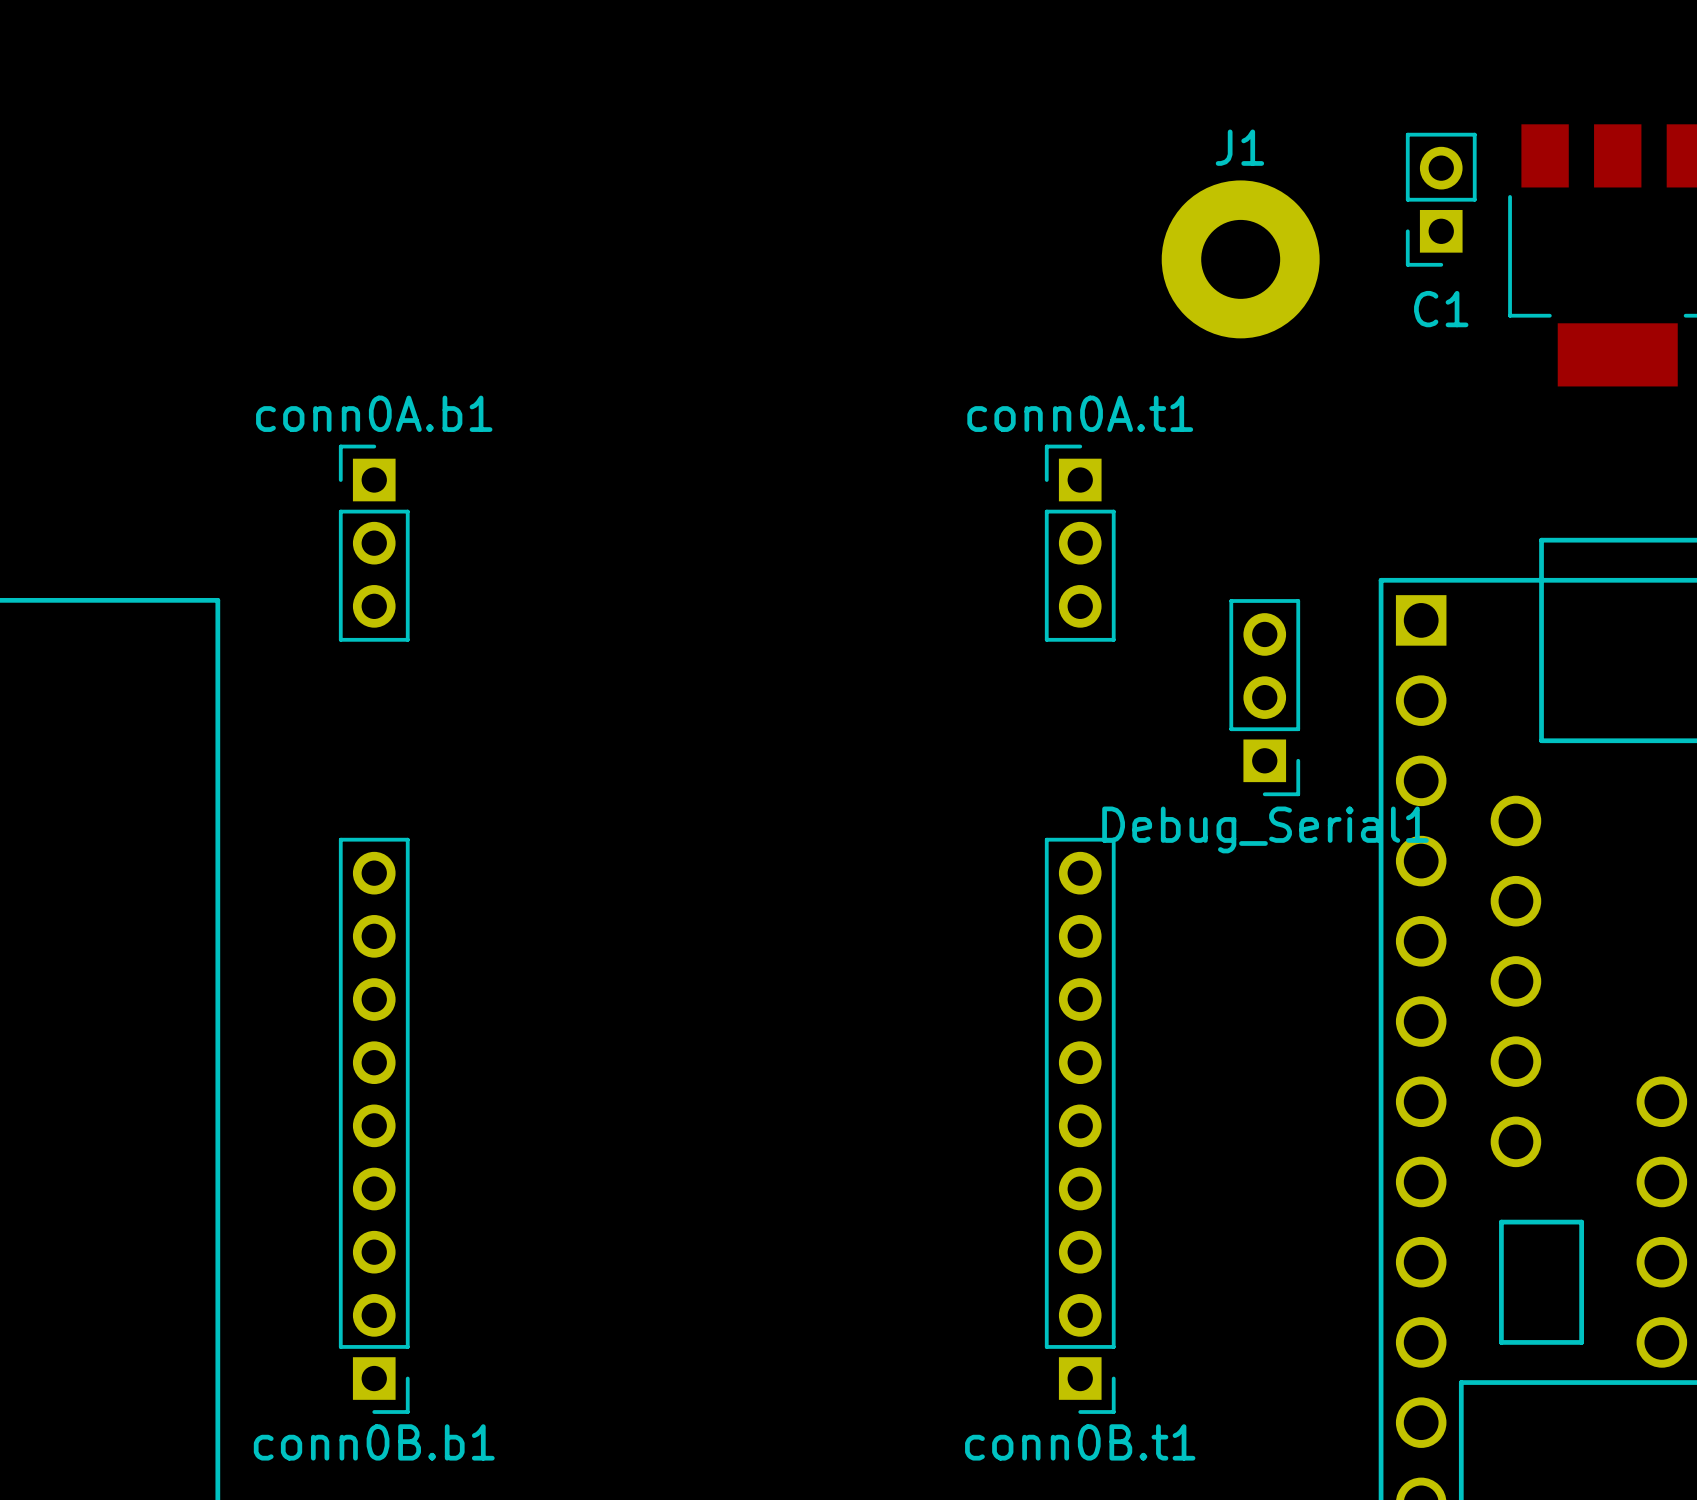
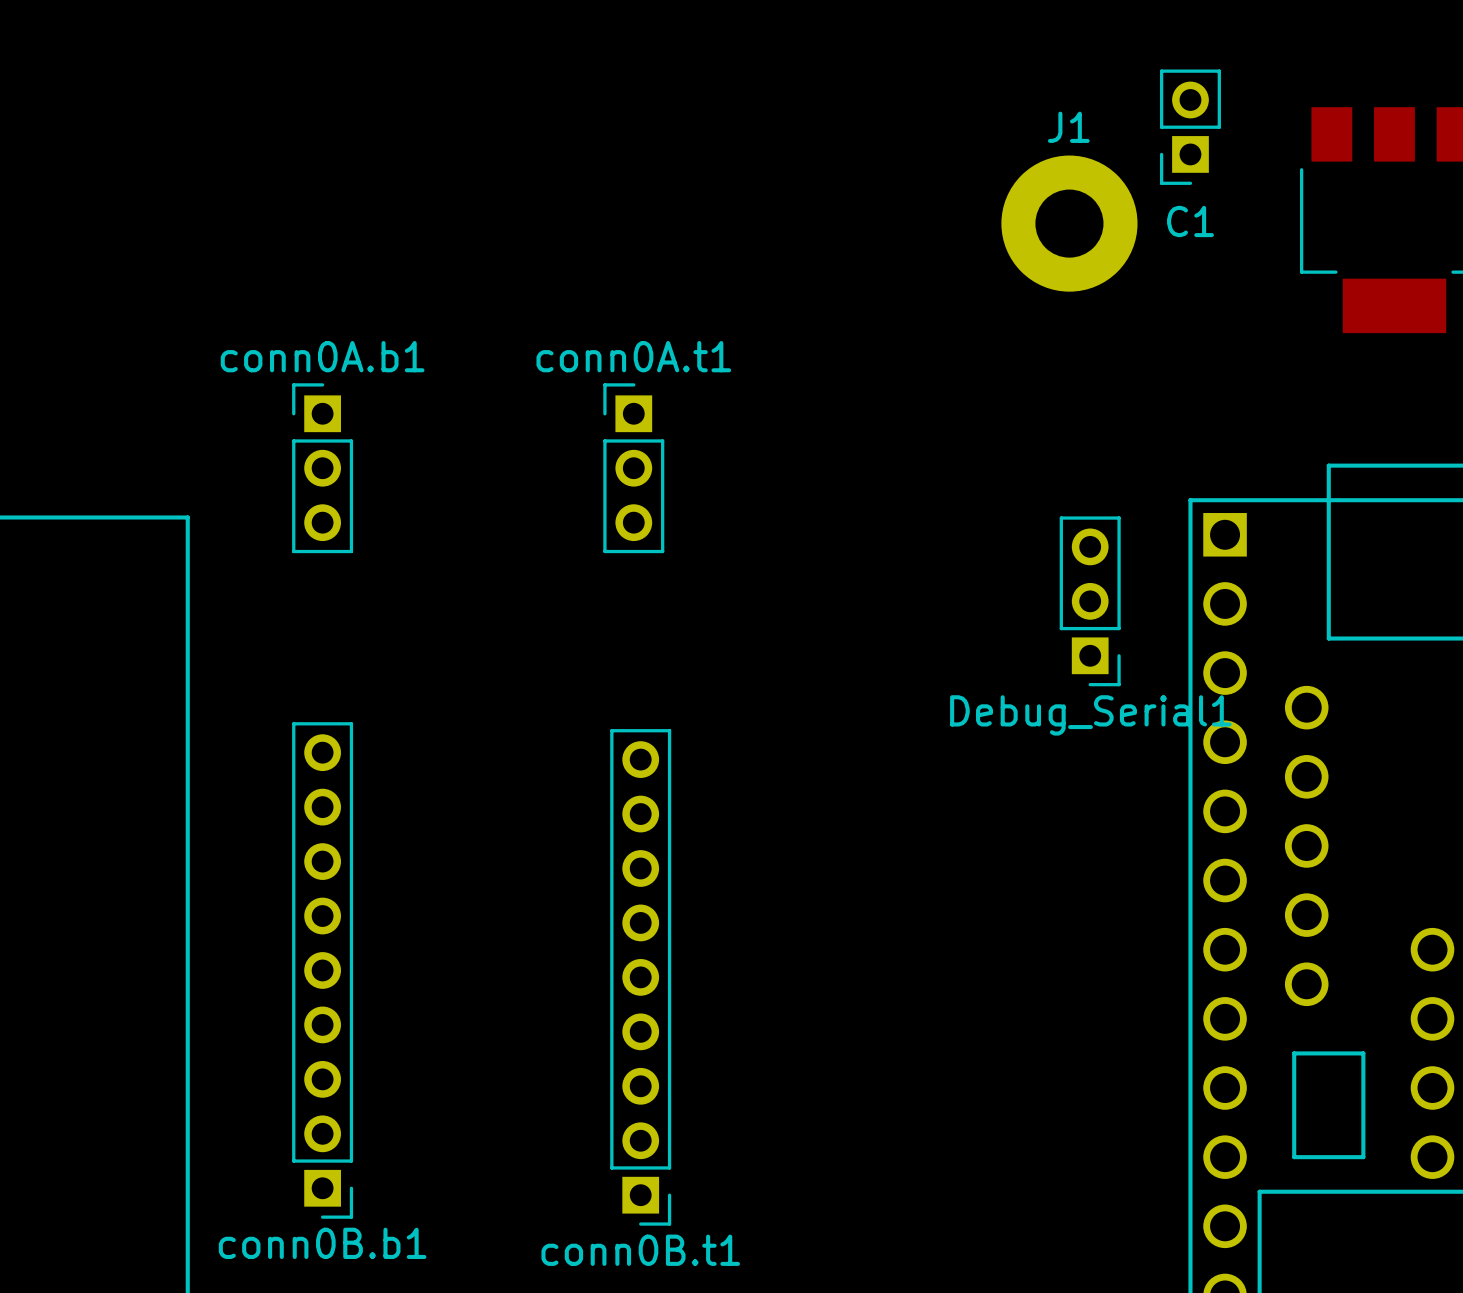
C1 position: (1441, 199) -> (1190, 127)
conn0A.t1 position: (1080, 543) -> (633, 468)
conn0B.t1 position: (1080, 1125) -> (640, 977)

